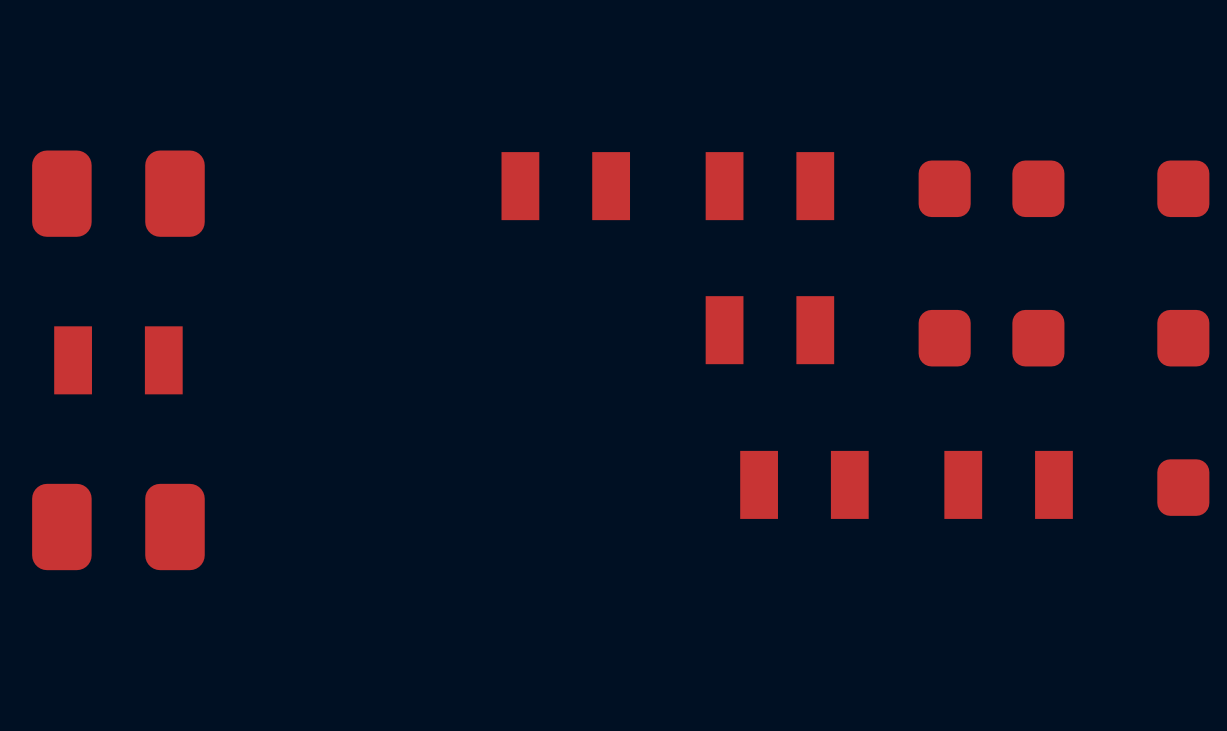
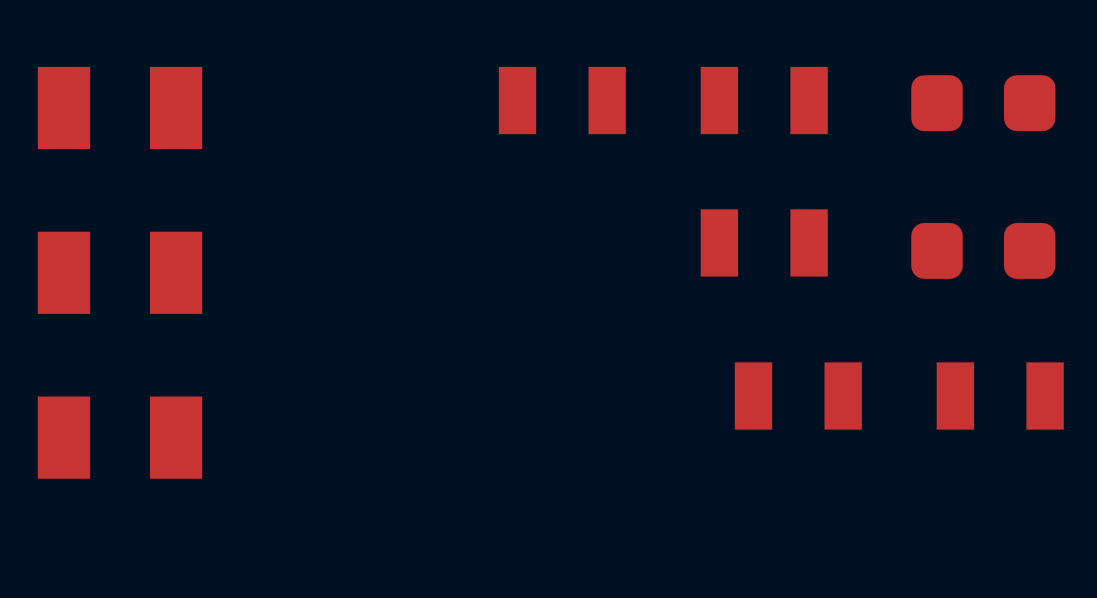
part footprint: [32, 150, 205, 237] -> [37, 66, 203, 150]
part footprint: [54, 326, 183, 395] -> [37, 231, 203, 314]
part footprint: [32, 483, 205, 571] -> [37, 396, 203, 479]

